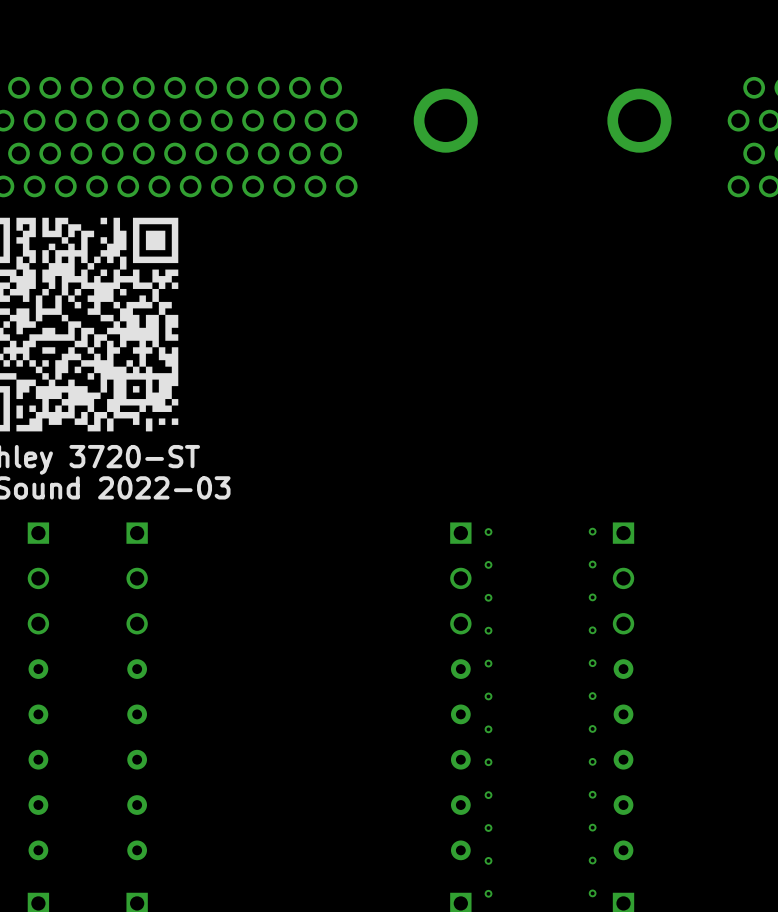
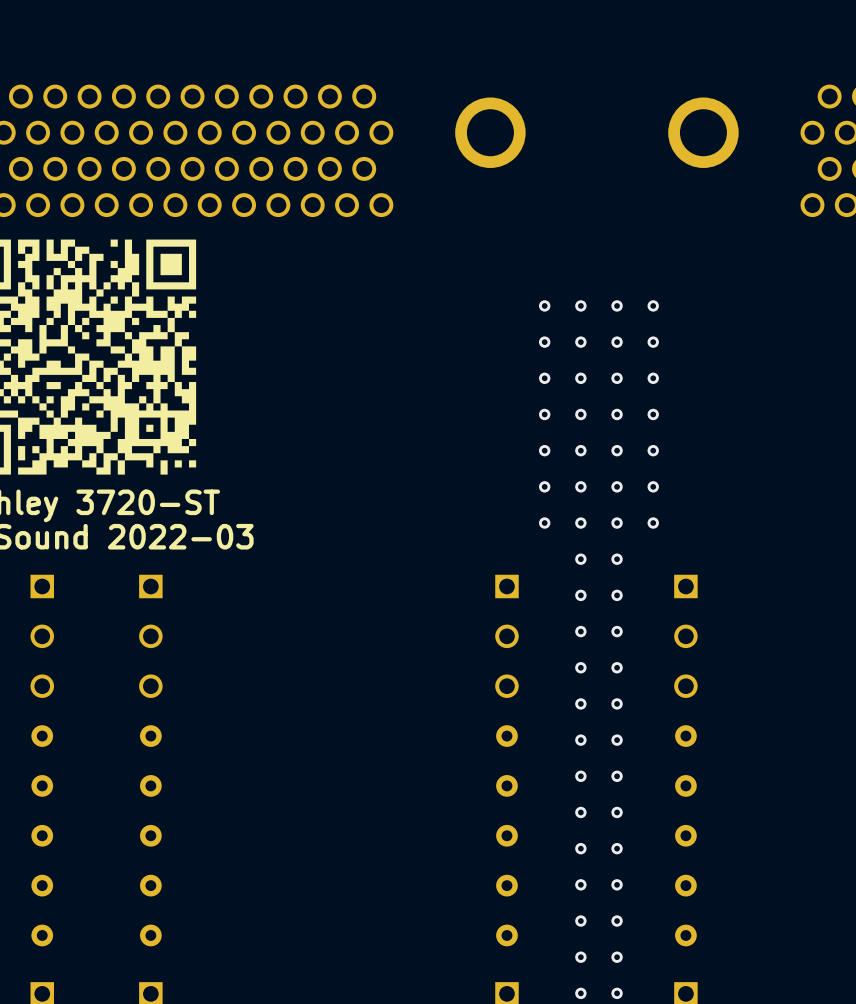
via: none -> (544, 305)
via: none -> (580, 305)
via: none -> (617, 305)
via: none -> (653, 305)
via: none -> (544, 342)
via: none -> (580, 342)
via: none -> (617, 342)
via: none -> (653, 342)
via: none -> (544, 378)
via: none -> (580, 378)
via: none -> (617, 378)
via: none -> (653, 378)
via: none -> (544, 414)
via: none -> (580, 414)
via: none -> (617, 414)
via: none -> (653, 414)
via: none -> (544, 450)
via: none -> (580, 450)
via: none -> (617, 450)
via: none -> (653, 450)
via: none -> (544, 486)
via: none -> (580, 486)
via: none -> (617, 486)
via: none -> (653, 486)
via: none -> (544, 523)
via: none -> (580, 523)
via: none -> (617, 523)
via: none -> (653, 523)
via: none -> (580, 559)
via: none -> (617, 559)
part: (592, 531) -> none
part: (488, 532) -> none
via: none -> (580, 595)
via: none -> (617, 595)
part: (488, 564) -> none
part: (592, 564) -> none
via: none -> (580, 631)
via: none -> (617, 631)
part: (488, 597) -> none
part: (592, 597) -> none
via: none -> (580, 667)
via: none -> (617, 667)
part: (488, 630) -> none
part: (592, 630) -> none
via: none -> (580, 703)
via: none -> (617, 703)
part: (488, 663) -> none
part: (592, 663) -> none
via: none -> (580, 740)
via: none -> (617, 740)
part: (488, 696) -> none
part: (592, 696) -> none
via: none -> (580, 776)
via: none -> (617, 776)
part: (592, 728) -> none
part: (488, 729) -> none
via: none -> (580, 812)
via: none -> (617, 812)
part: (592, 761) -> none
part: (488, 762) -> none
via: none -> (580, 848)
via: none -> (617, 848)
part: (592, 794) -> none
part: (488, 795) -> none
via: none -> (580, 884)
via: none -> (617, 884)
part: (592, 827) -> none
part: (488, 828) -> none
via: none -> (580, 921)
via: none -> (617, 921)
part: (488, 860) -> none
part: (592, 860) -> none
via: none -> (580, 957)
via: none -> (617, 957)
part: (488, 893) -> none
part: (592, 893) -> none
via: none -> (580, 993)
via: none -> (617, 993)

